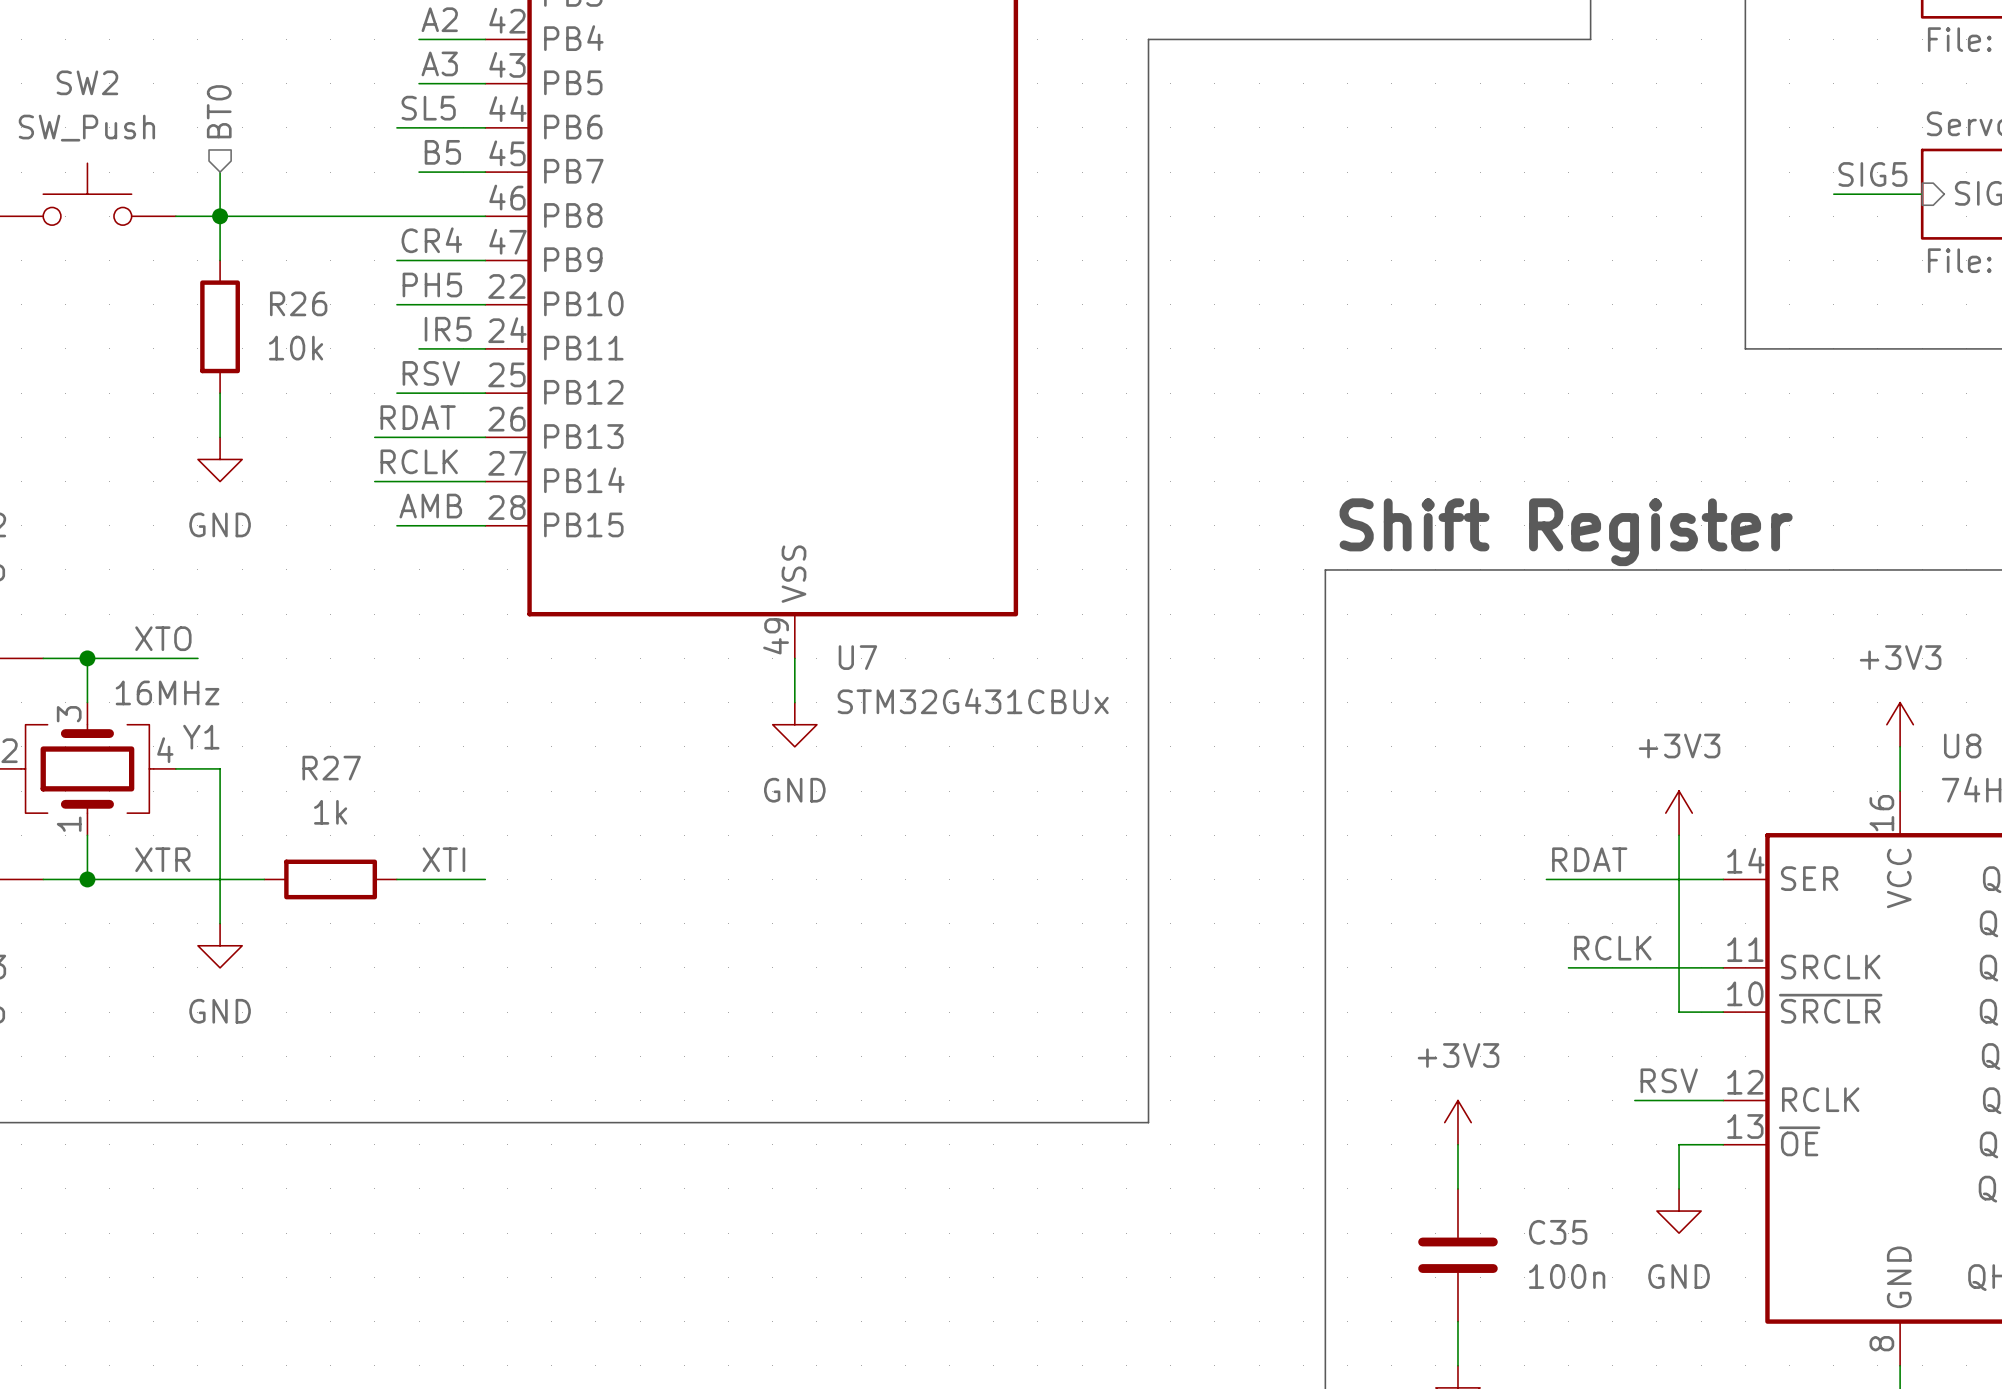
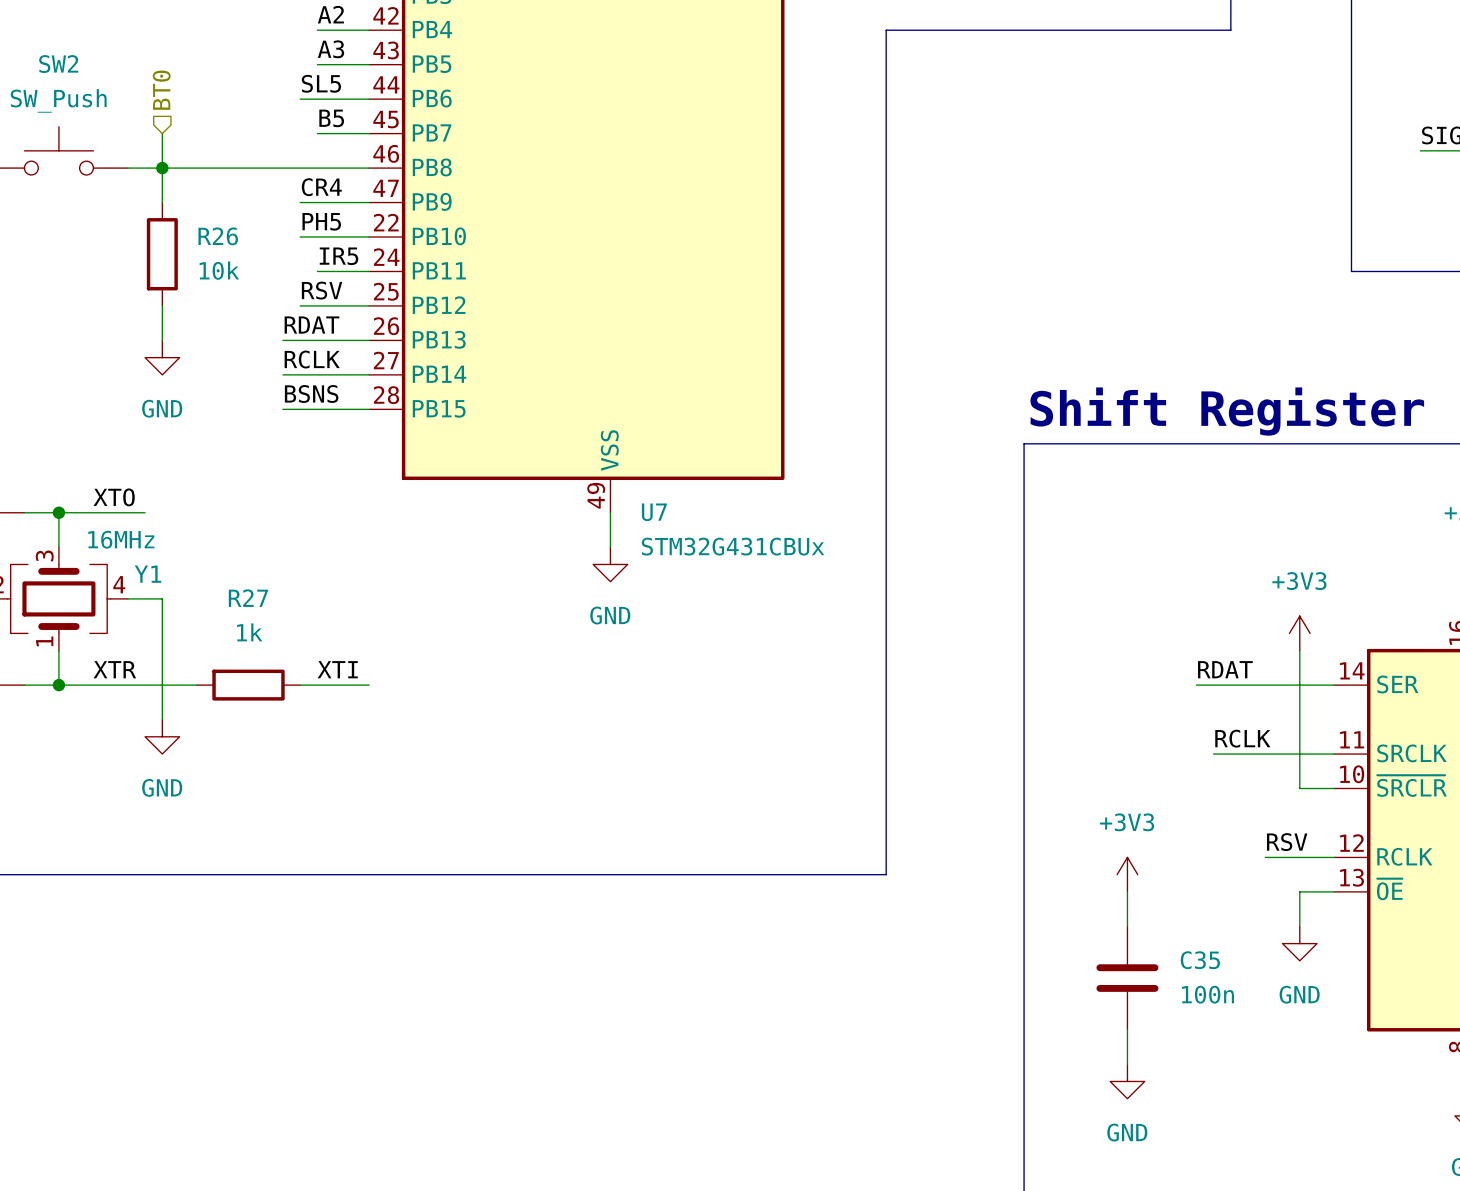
label: none -> BSNS (311, 393)
label: AMB (430, 506) -> none
wire: none -> (282, 409) (300, 409)

